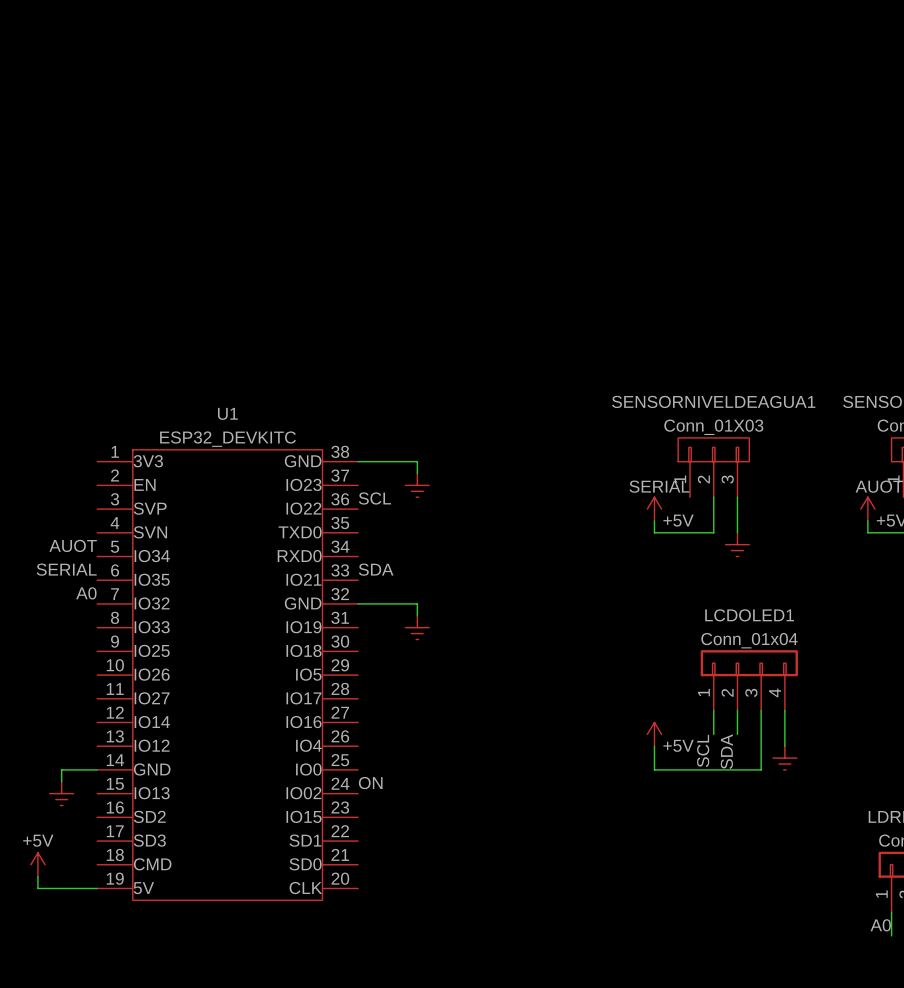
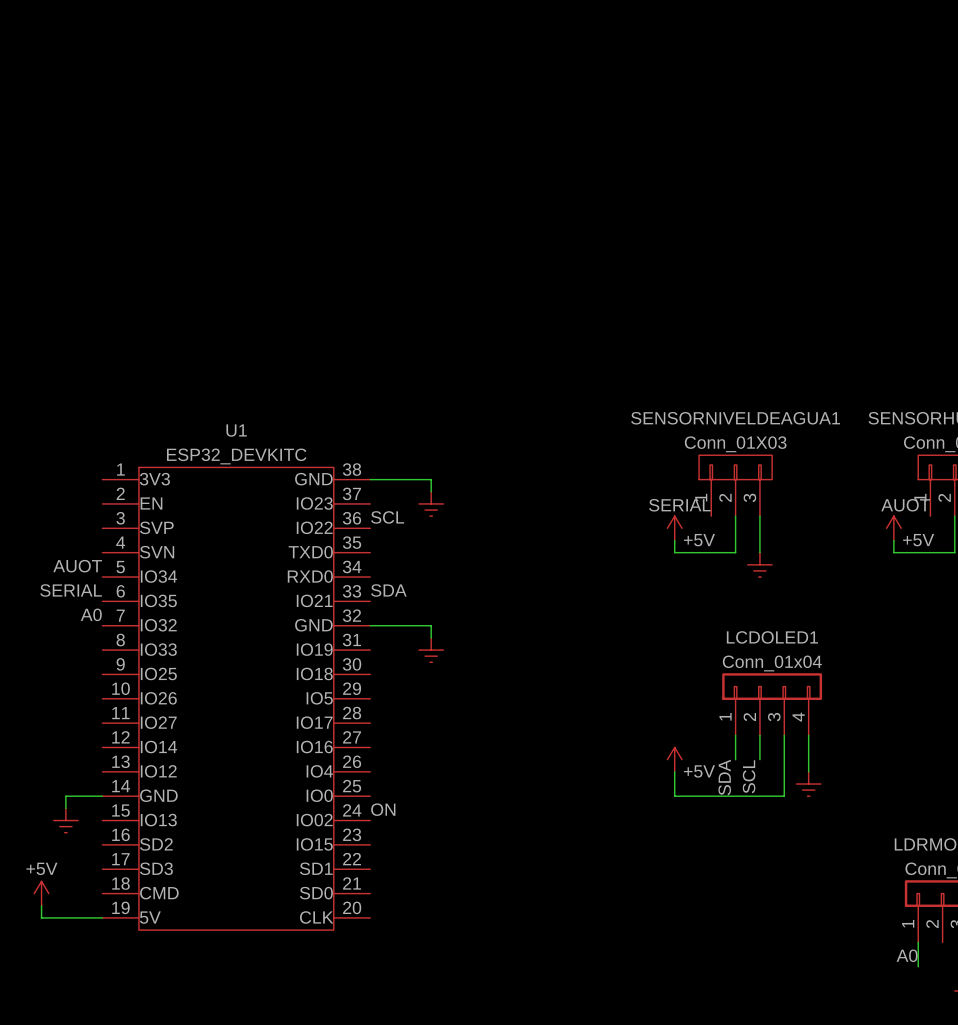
label: SCL (703, 751) -> SDA (724, 777)
label: SDA (726, 751) -> SCL (749, 776)

